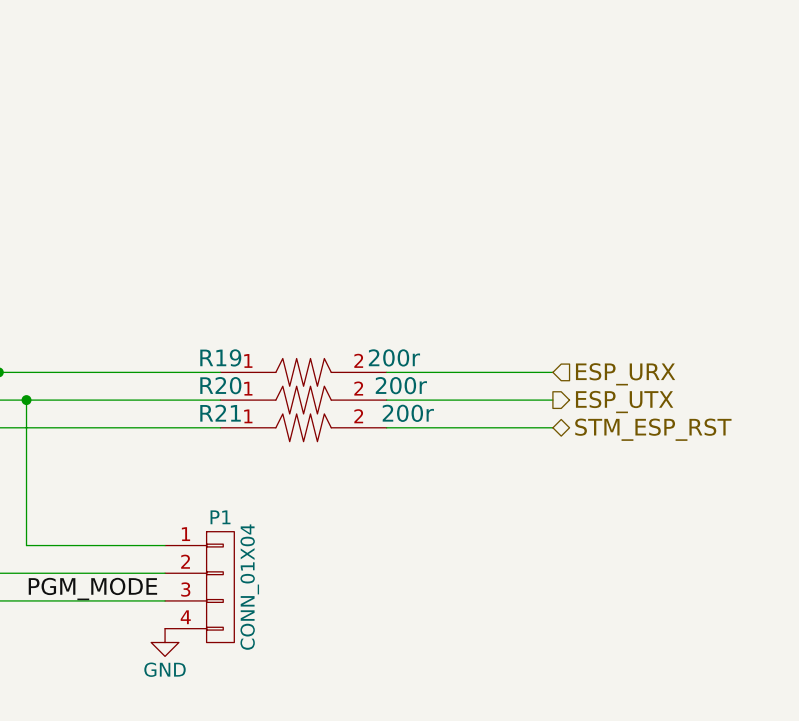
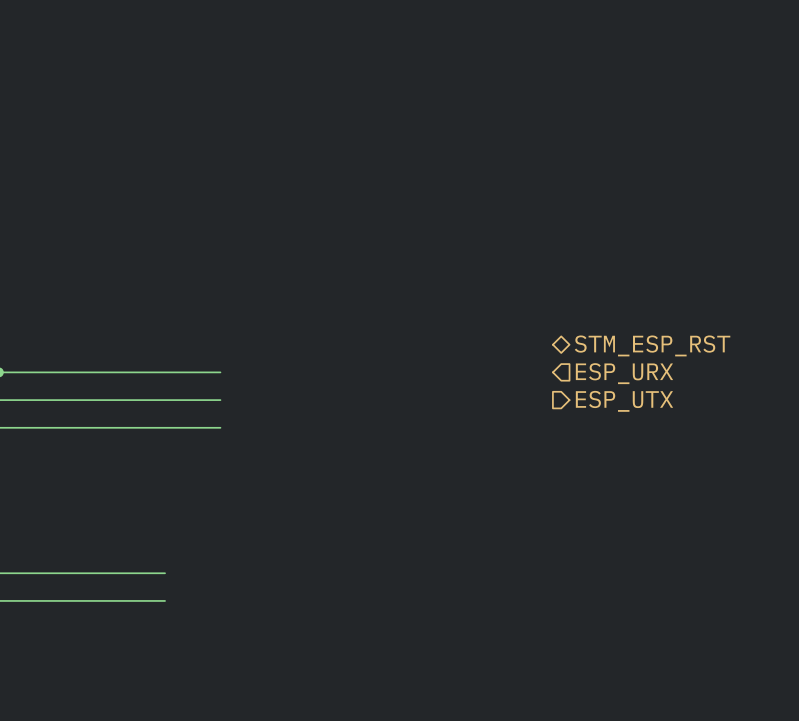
R19: (303, 372) -> none
wire: (386, 372) (552, 372) -> none
wire: (26, 400) (26, 545) (165, 545) -> none
junction: (26, 400) -> none
R20: (303, 400) -> none
wire: (386, 400) (552, 400) -> none
R21: (303, 427) -> none
wire: (386, 427) (552, 427) -> none
hierarchical label position: STM_ESP_RST (653, 429) -> STM_ESP_RST (652, 345)
P1: CONN_01X04 (199, 587) -> none
label: PGM_MODE (92, 588) -> none
power symbol: GND (165, 642) -> none

